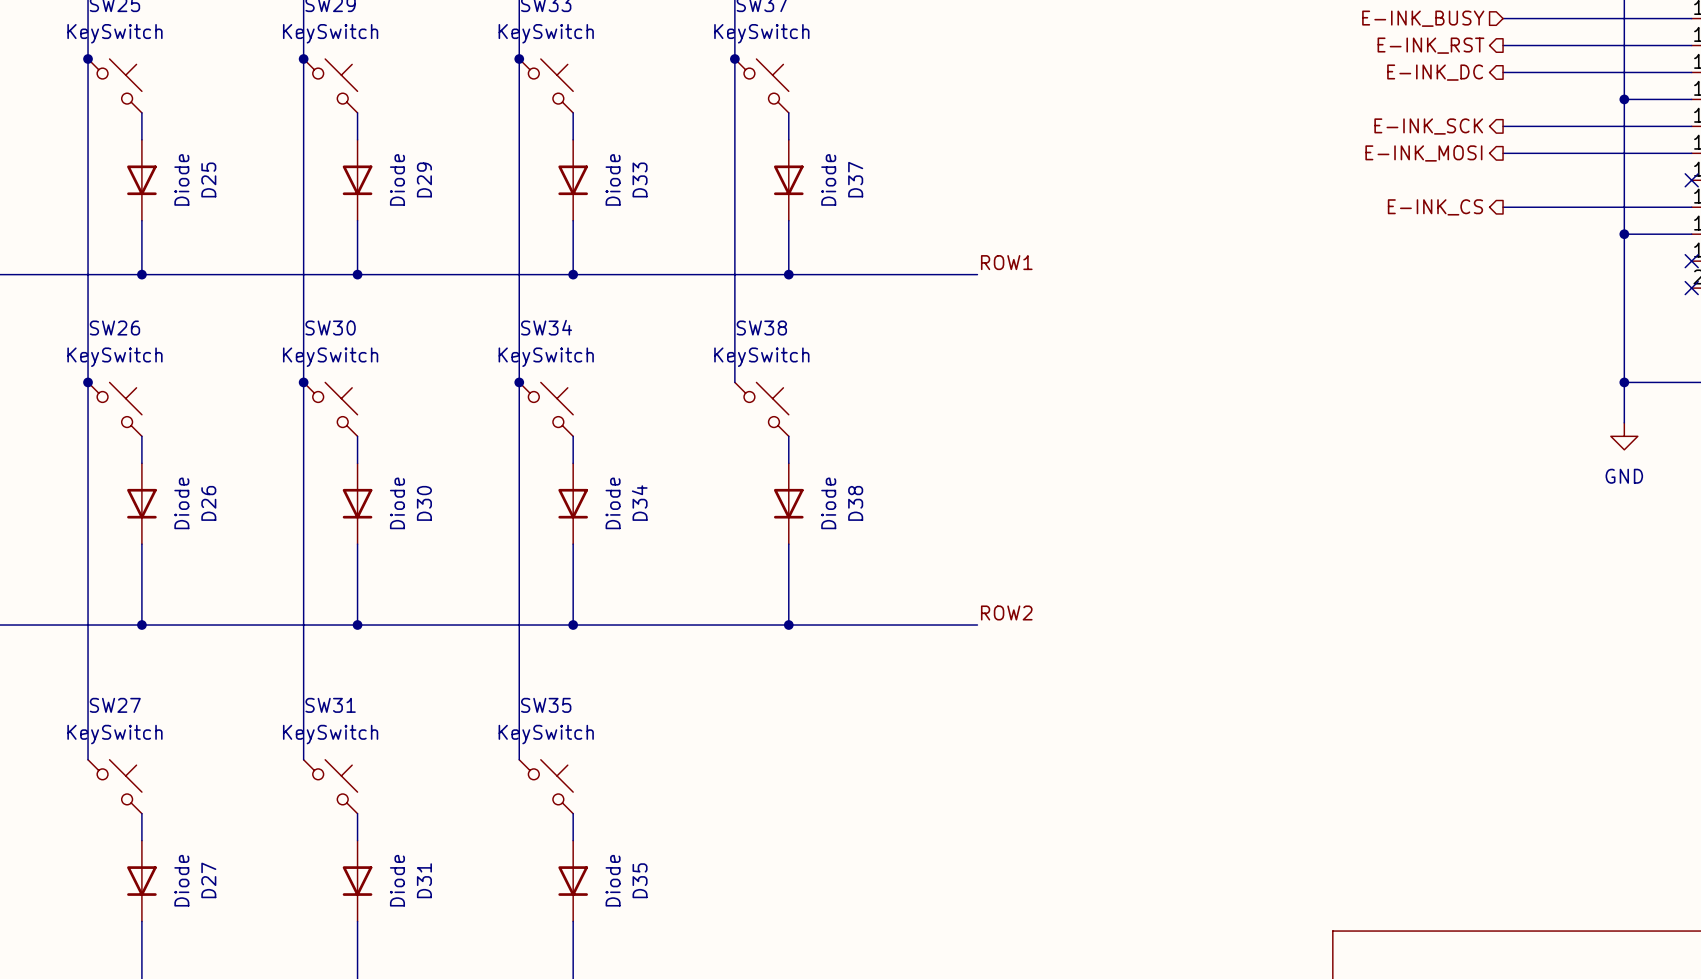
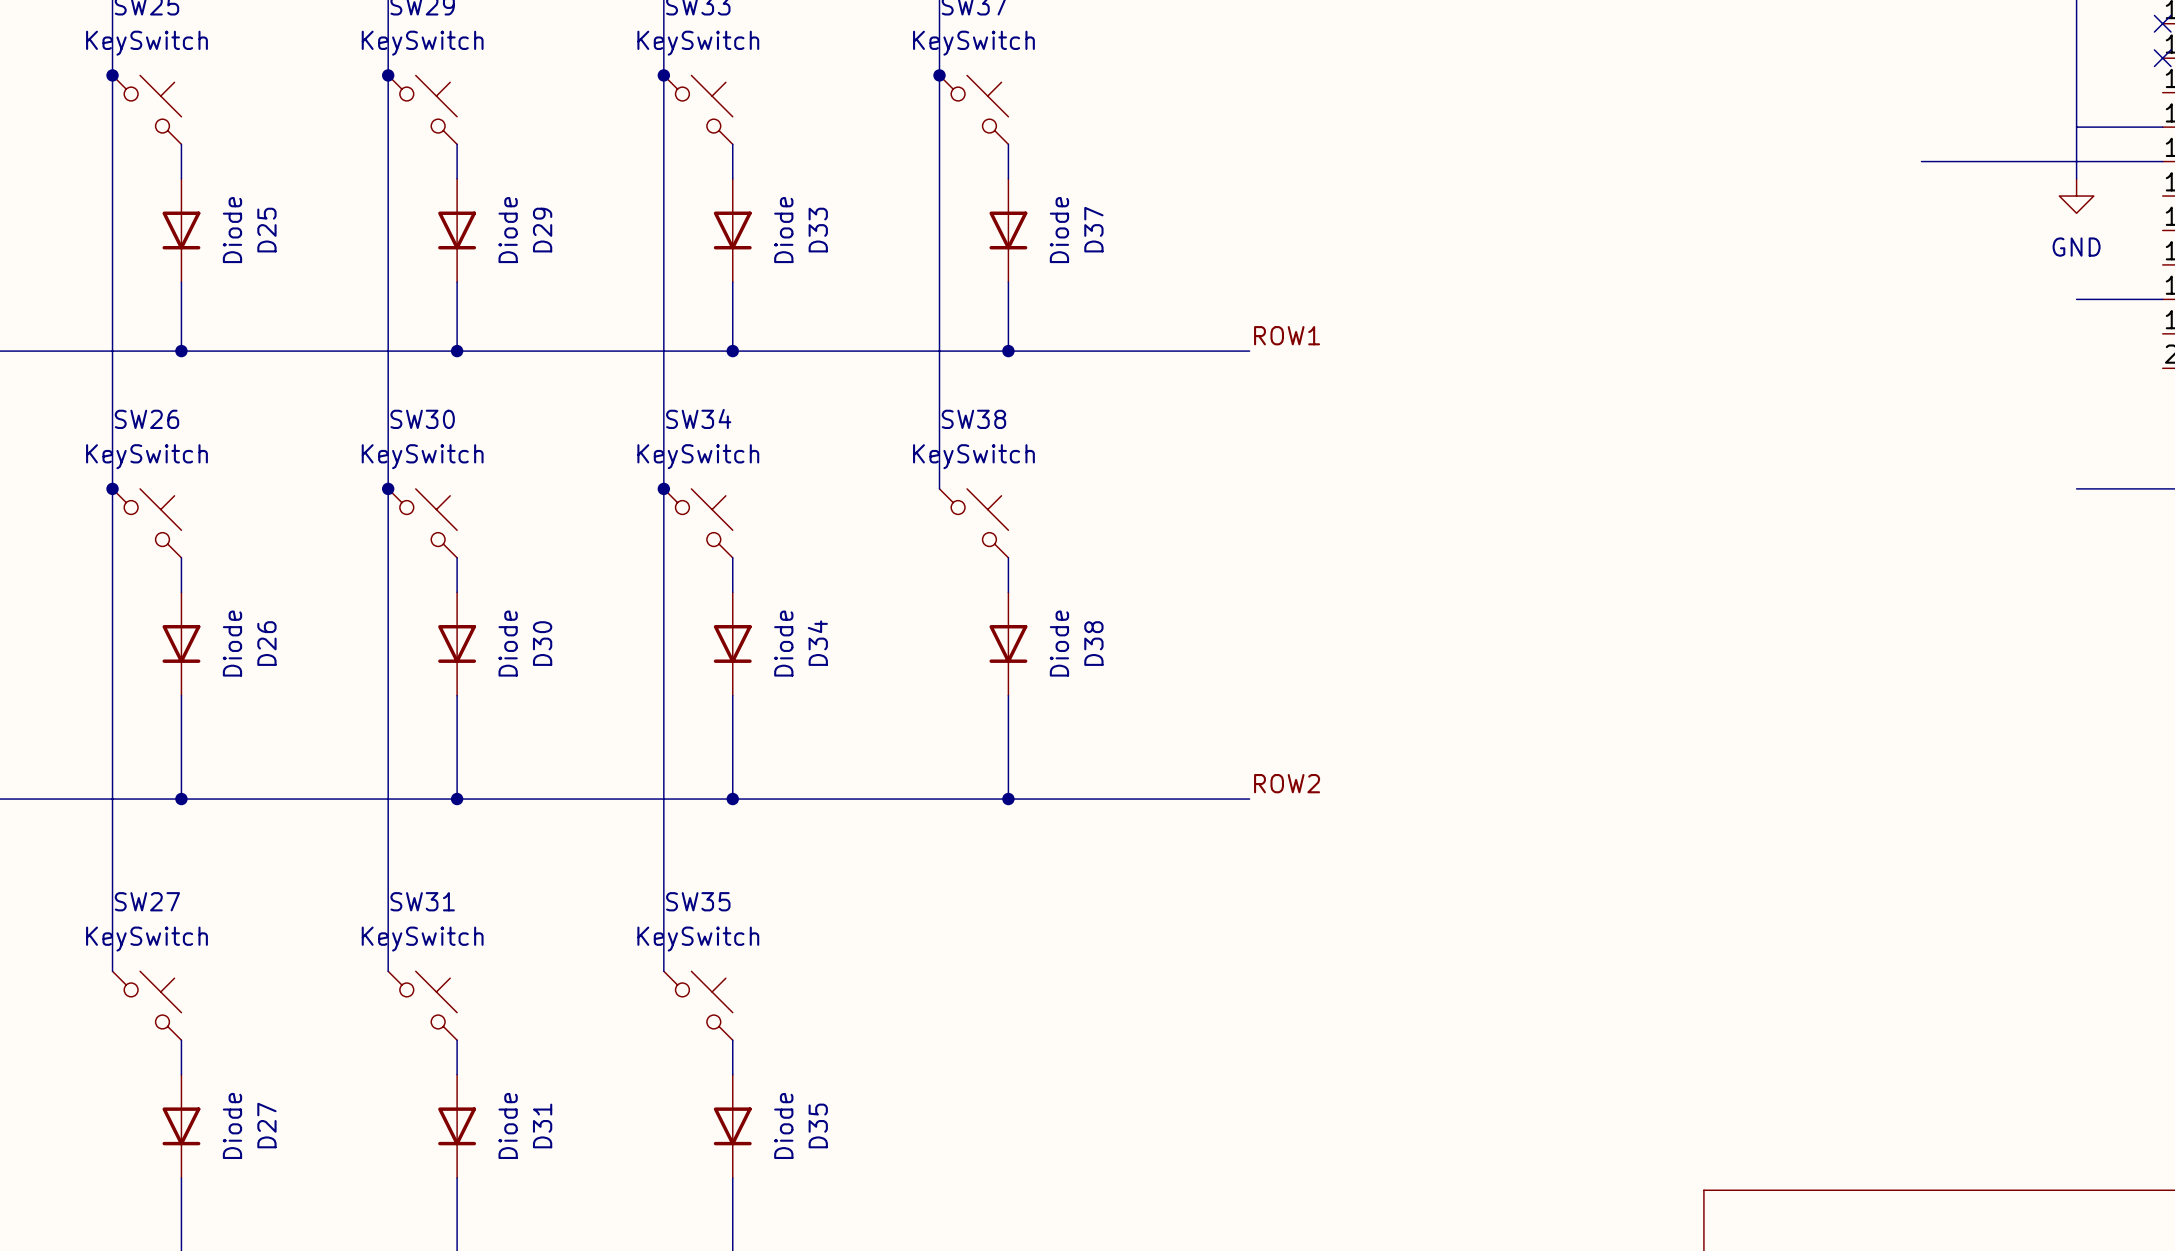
hierarchical label: E-INK_BUSY (1423, 18) -> none
wire: (1503, 18) (1691, 18) -> none
no-connect mark: none -> (2162, 23)
hierarchical label: E-INK_RST (1430, 45) -> none
wire: (1503, 45) (1691, 45) -> none
no-connect mark: none -> (2162, 58)
hierarchical label: E-INK_DC (1435, 72) -> none
wire: (1503, 72) (1691, 72) -> none
junction: (1624, 99) -> none
hierarchical label: E-INK_SCK (1428, 126) -> none
wire: (1624, 139) (1624, 422) -> none
hierarchical label: E-INK_MOSI (1423, 153) -> none
wire: (1503, 153) (1691, 153) -> none
power symbol: none -> GND (2076, 196)
no-connect mark: (1691, 180) -> none
hierarchical label: E-INK_CS (1435, 207) -> none
wire: (1503, 207) (1691, 207) -> none
junction: (1624, 234) -> none
no-connect mark: (1691, 261) -> none
no-connect mark: (1691, 288) -> none
junction: (1624, 382) -> none
power symbol: GND (1624, 436) -> none

